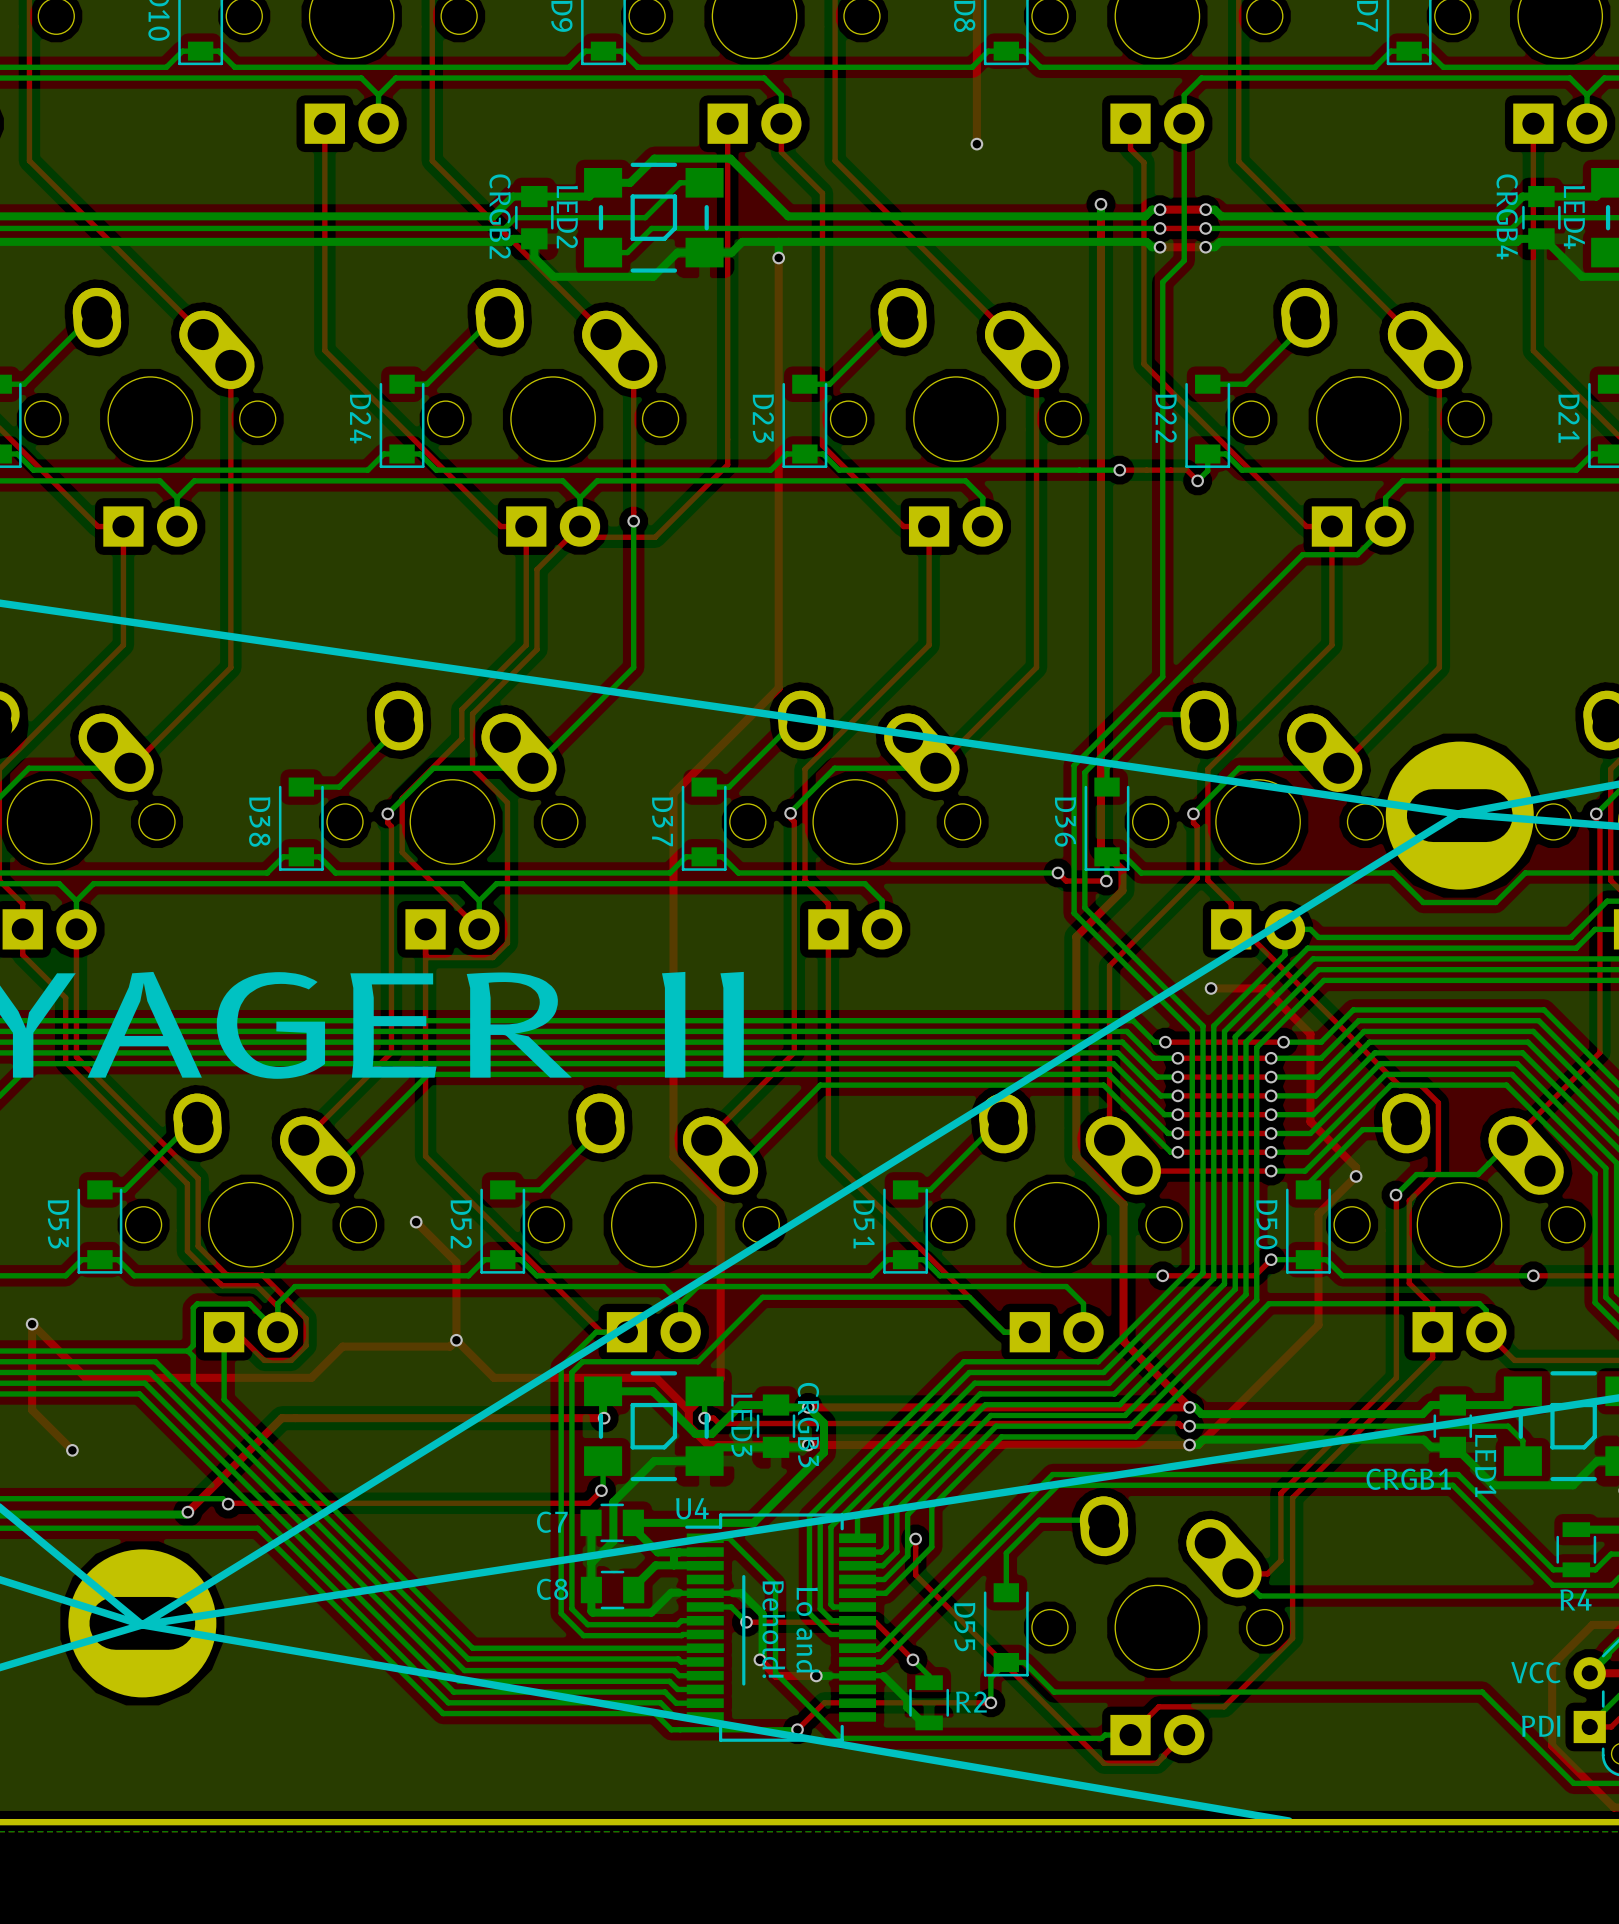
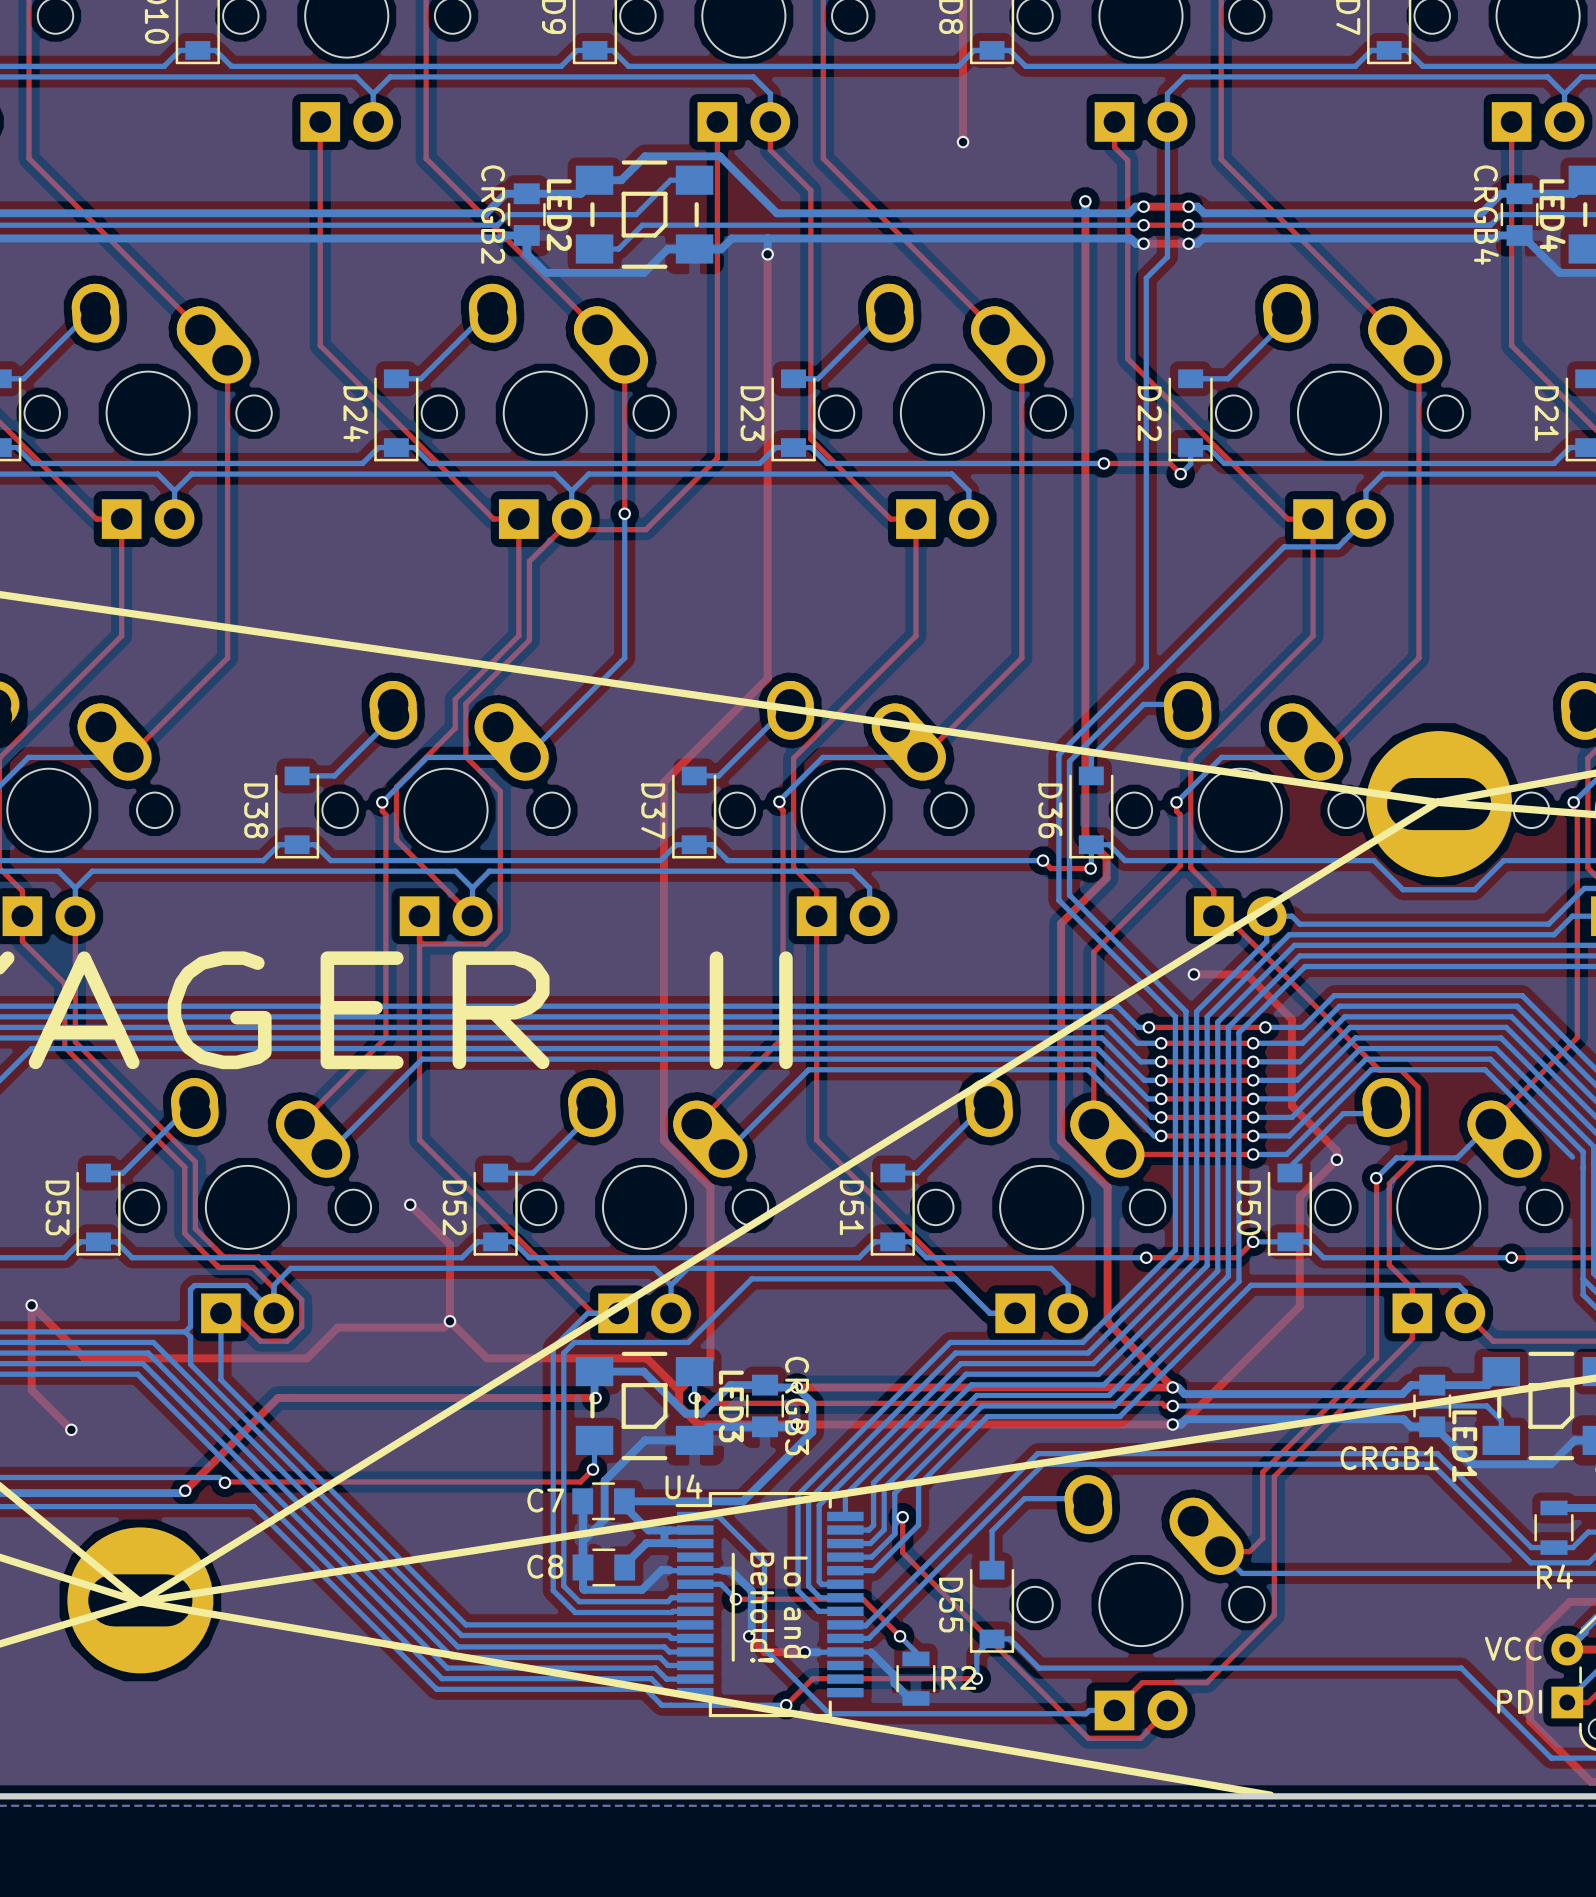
bottom track: (1595, 1173) (1595, 1302) (1605, 1313) -> (1583, 1278) (1583, 1294)

